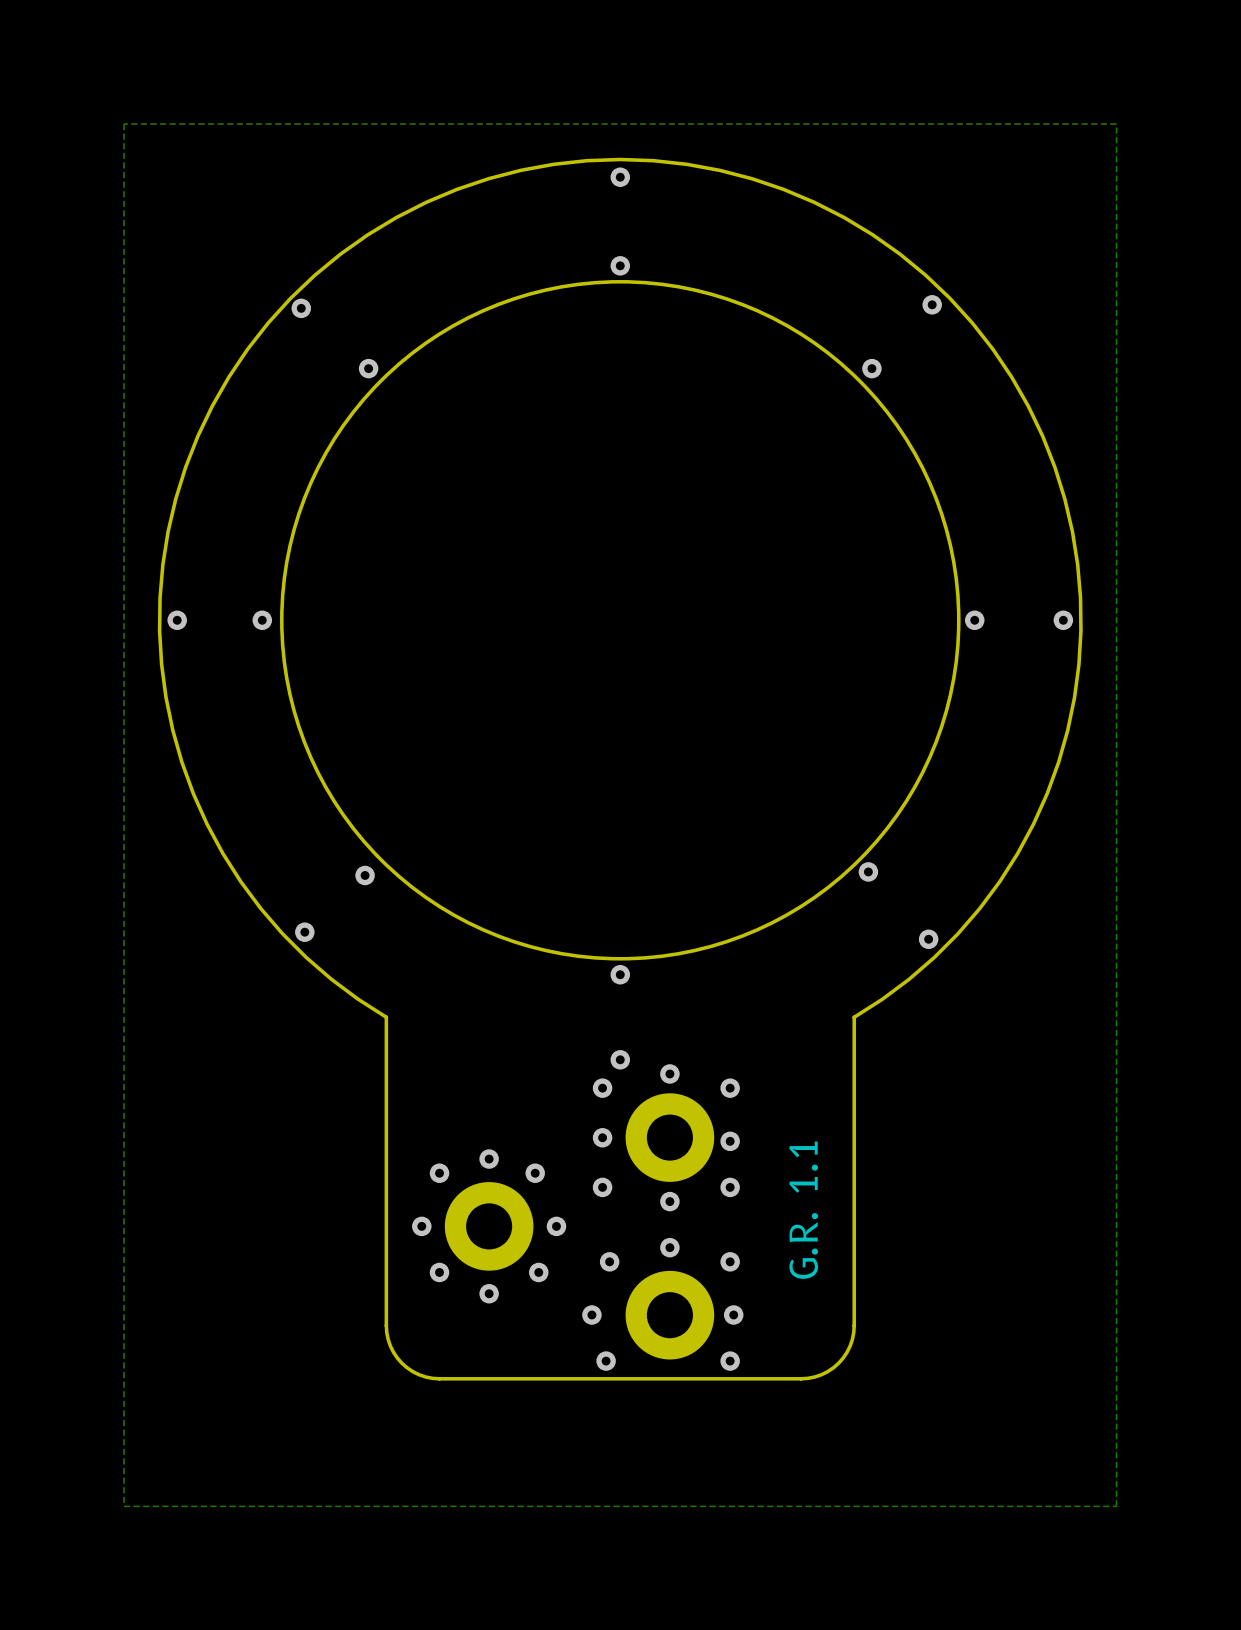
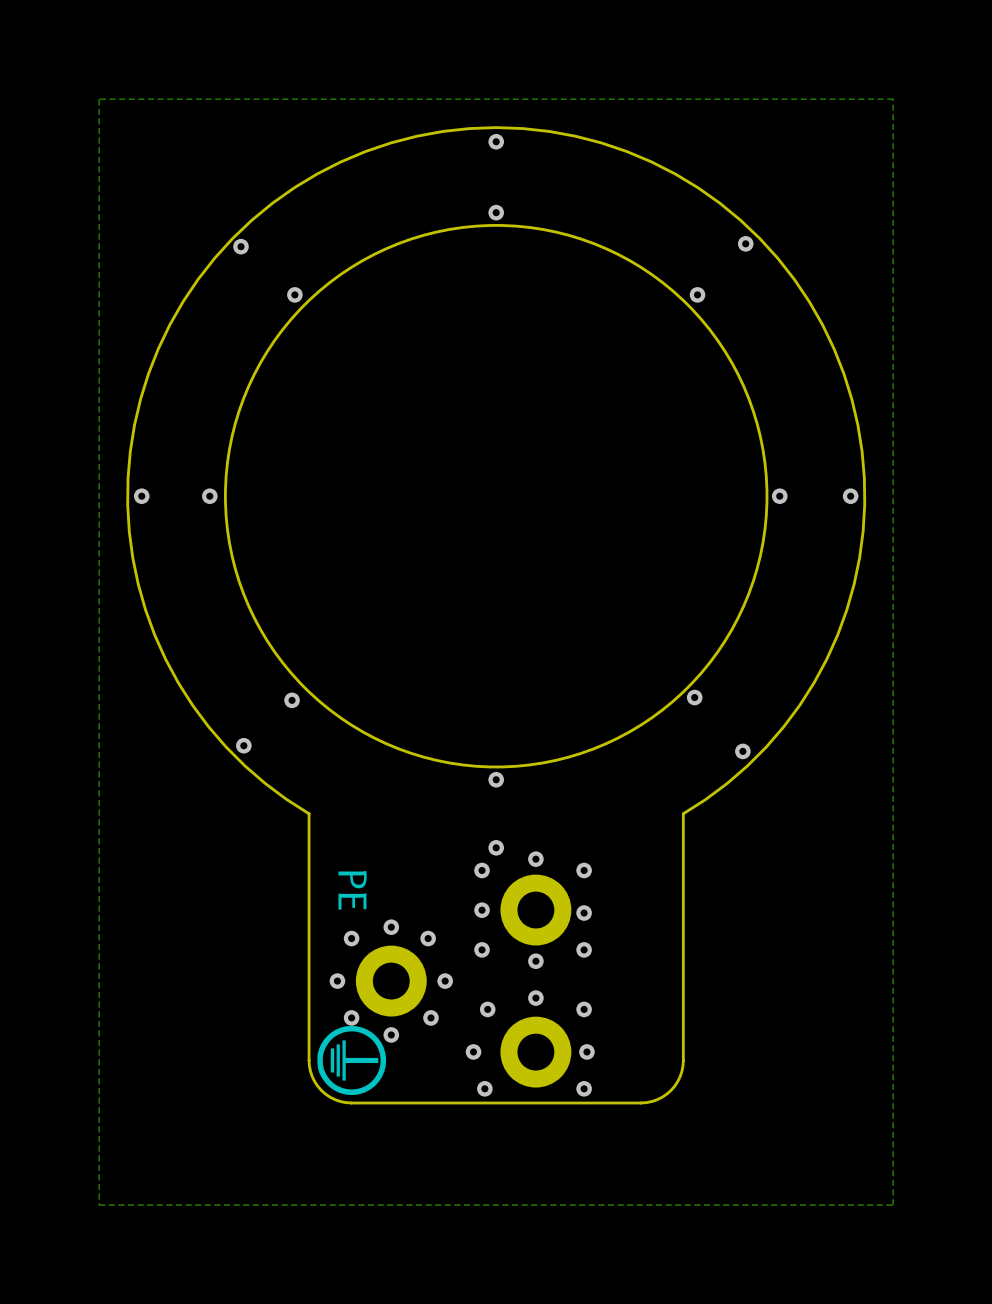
text: none -> PE (352, 890)
text: G.R. 1.1 (803, 1210) -> none
drawing: none -> [317, 1025, 387, 1096]

